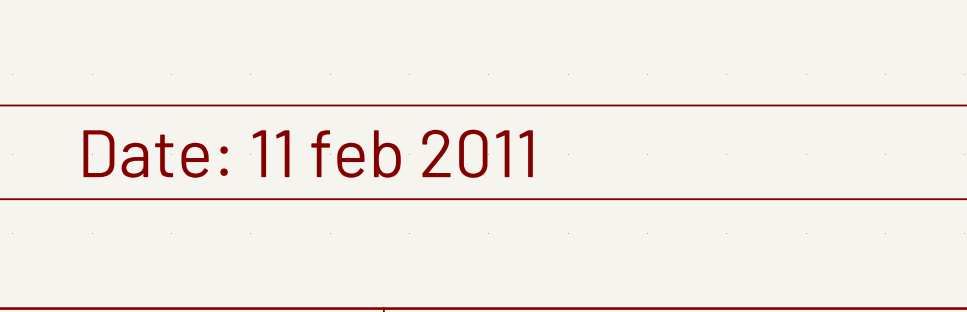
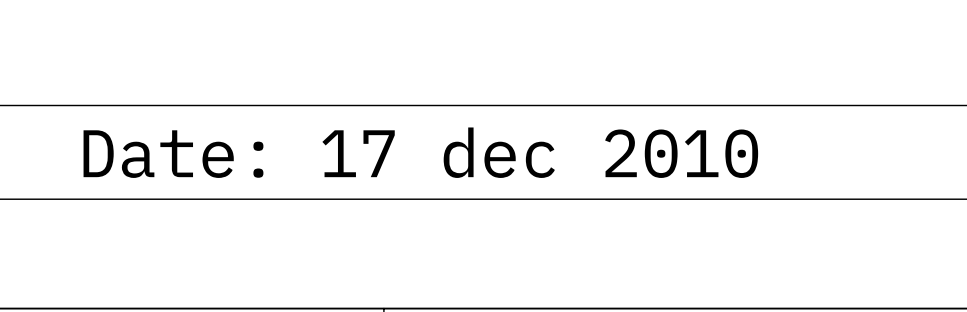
title block: Date: 11 feb 2011 (308, 153) -> Date: 17 dec 2010 (420, 152)

